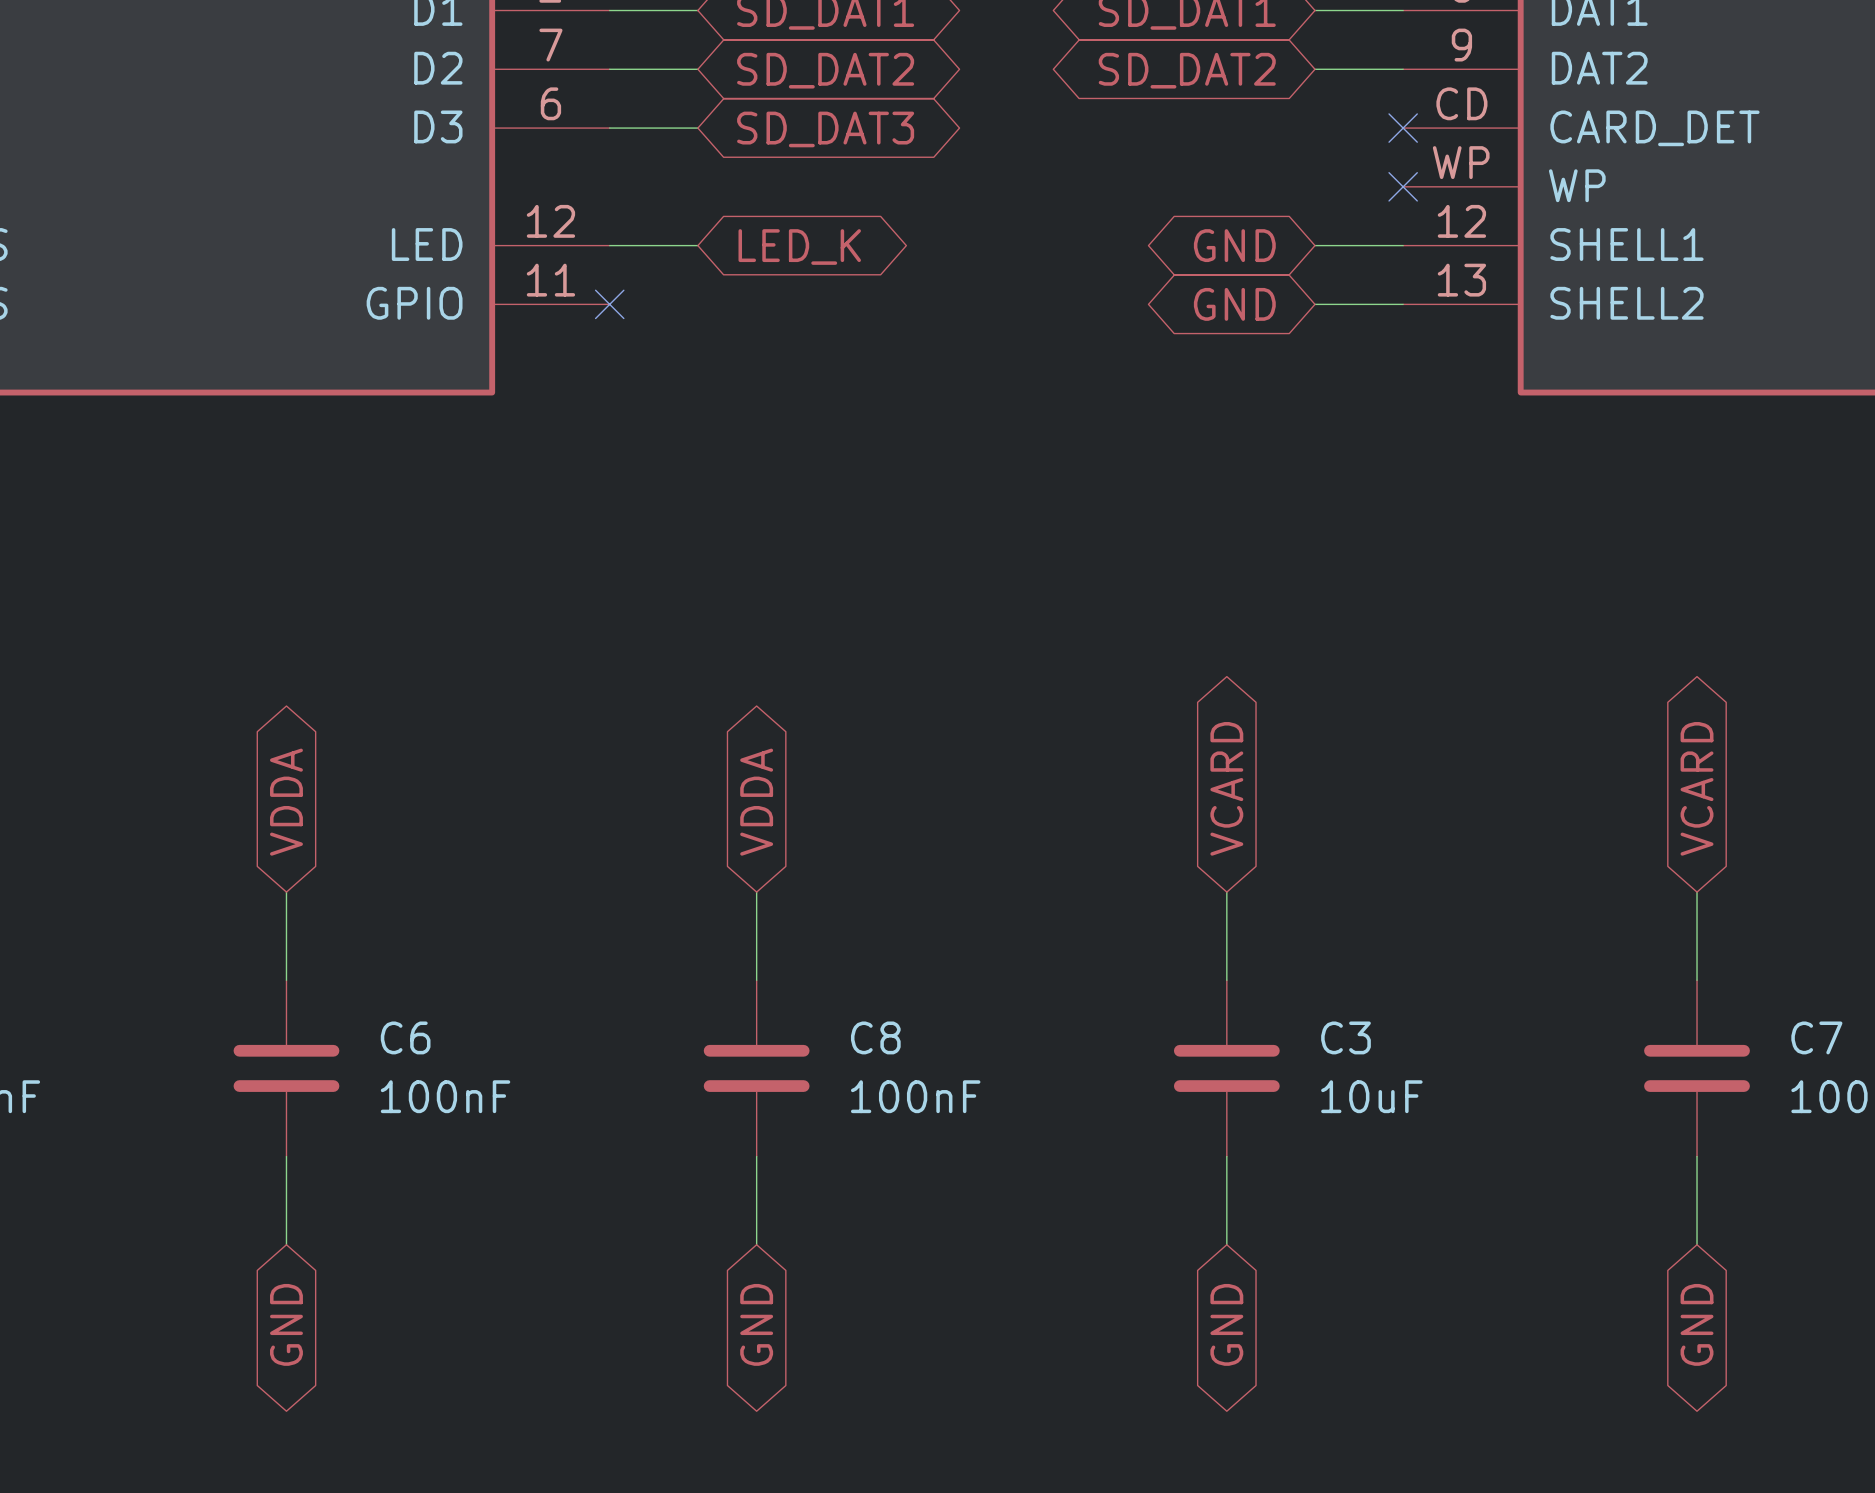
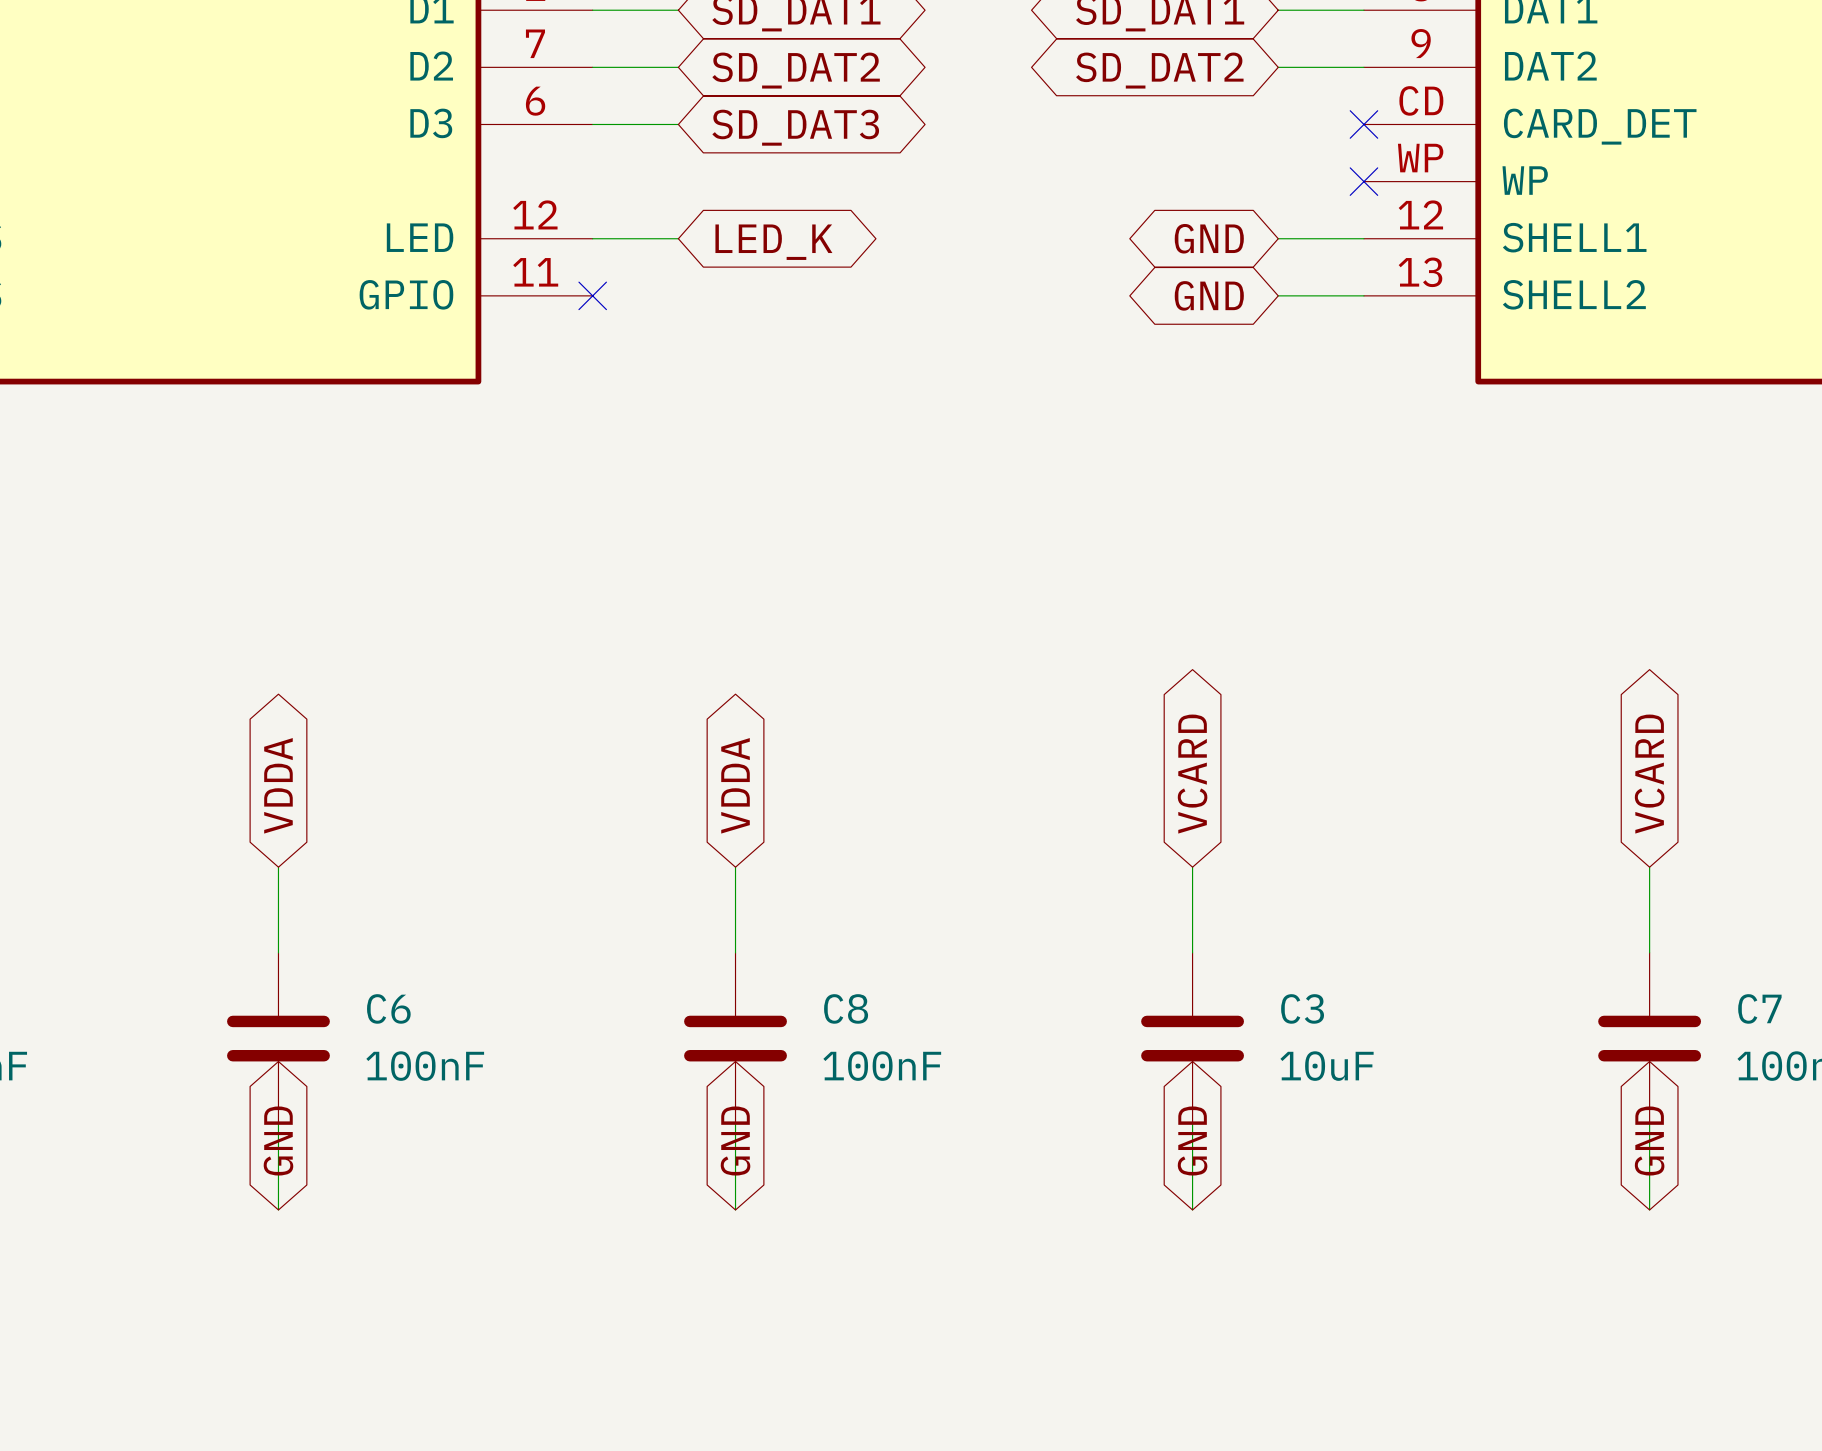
global label rotation: 0° (286, 1324) -> 180° (278, 1141)
global label rotation: 0° (756, 1324) -> 180° (735, 1141)
global label rotation: 0° (1226, 1324) -> 180° (1192, 1141)
global label rotation: 0° (1697, 1324) -> 180° (1649, 1141)

